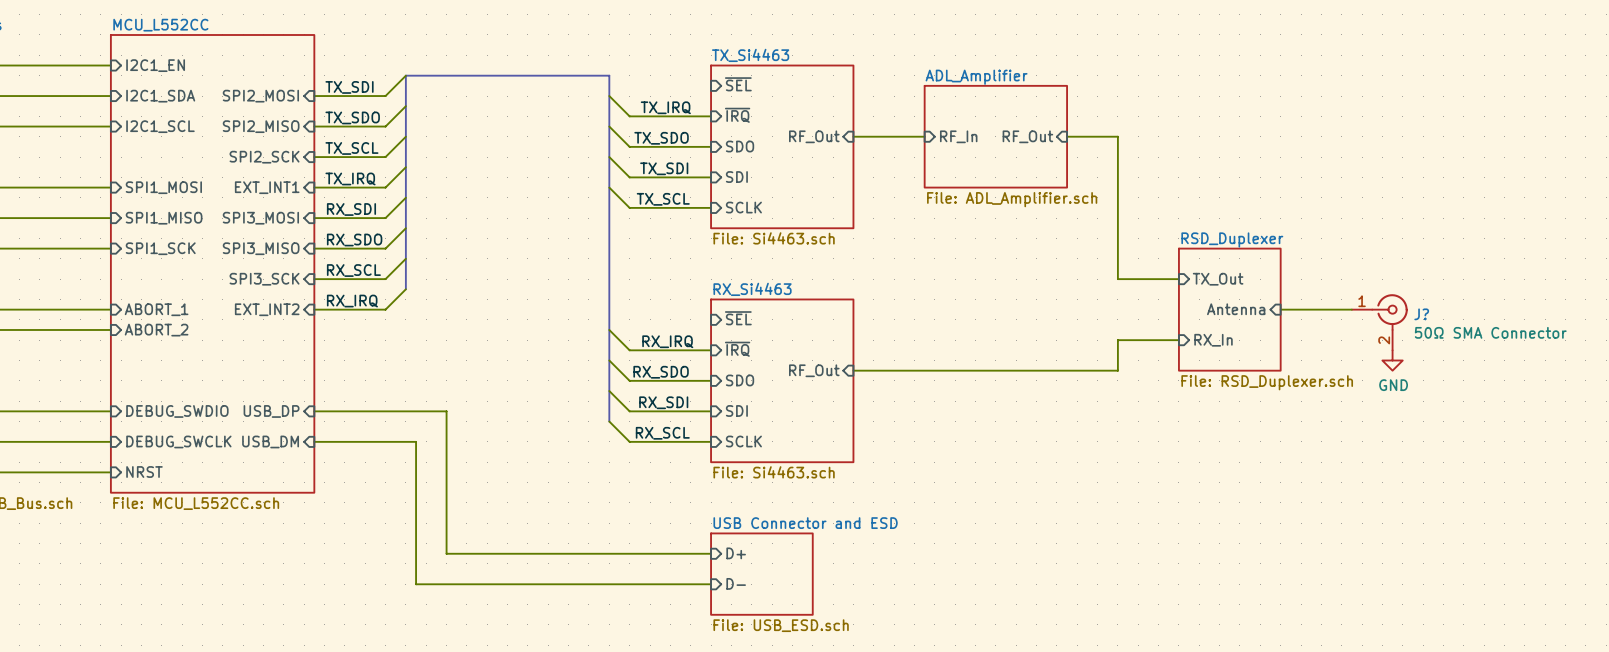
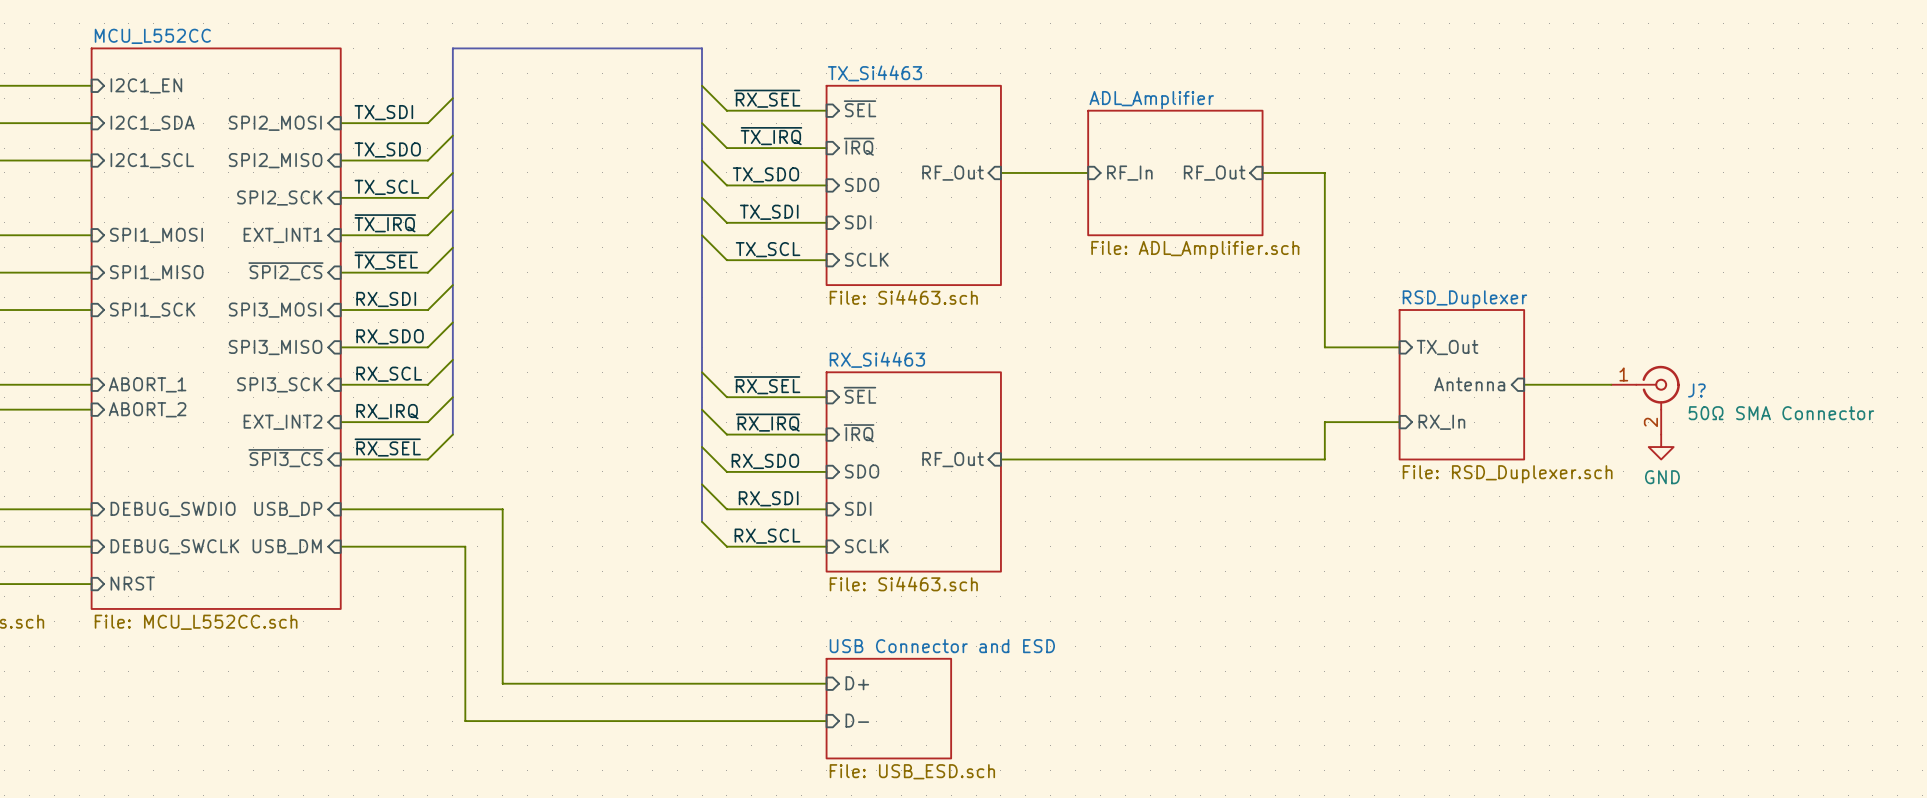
wire: none -> (702, 85) (726, 110) (826, 110)
bus: (405, 75) (609, 75) -> (452, 98) (452, 48) (702, 48) (702, 98)
label: none -> ~{RX_SEL} (767, 98)
label: TX_IRQ (665, 107) -> ~{TX_IRQ} (771, 136)
label: TX_IRQ (350, 178) -> ~{TX_IRQ} (385, 223)
label: RX_SDI (351, 209) -> ~{TX_SEL} (386, 260)
sheet pin: SPI3_MOSI (260, 218) -> ~{SPI2_CS} (285, 271)
label: RX_SDO (354, 240) -> RX_SDI (386, 299)
sheet pin: SPI3_MISO (261, 248) -> SPI3_MOSI (275, 310)
label: RX_SCL (353, 270) -> RX_SDO (390, 336)
sheet pin: SPI3_SCK (264, 279) -> SPI3_MISO (275, 347)
bus: none -> (452, 359) (452, 434)
wire: none -> (702, 372) (726, 397) (826, 397)
label: RX_IRQ (352, 301) -> RX_SCL (389, 374)
sheet pin: EXT_INT2 (267, 309) -> SPI3_SCK (279, 384)
label: none -> ~{RX_SEL} (767, 385)
wire: none -> (452, 397) (427, 422) (340, 422)
label: none -> RX_IRQ (387, 411)
sheet pin: none -> EXT_INT2 (283, 422)
label: RX_IRQ (667, 341) -> ~{RX_IRQ} (768, 422)
wire: none -> (452, 434) (427, 459) (340, 459)
label: none -> ~{RX_SEL} (387, 447)
sheet pin: none -> ~{SPI3_CS} (285, 458)

